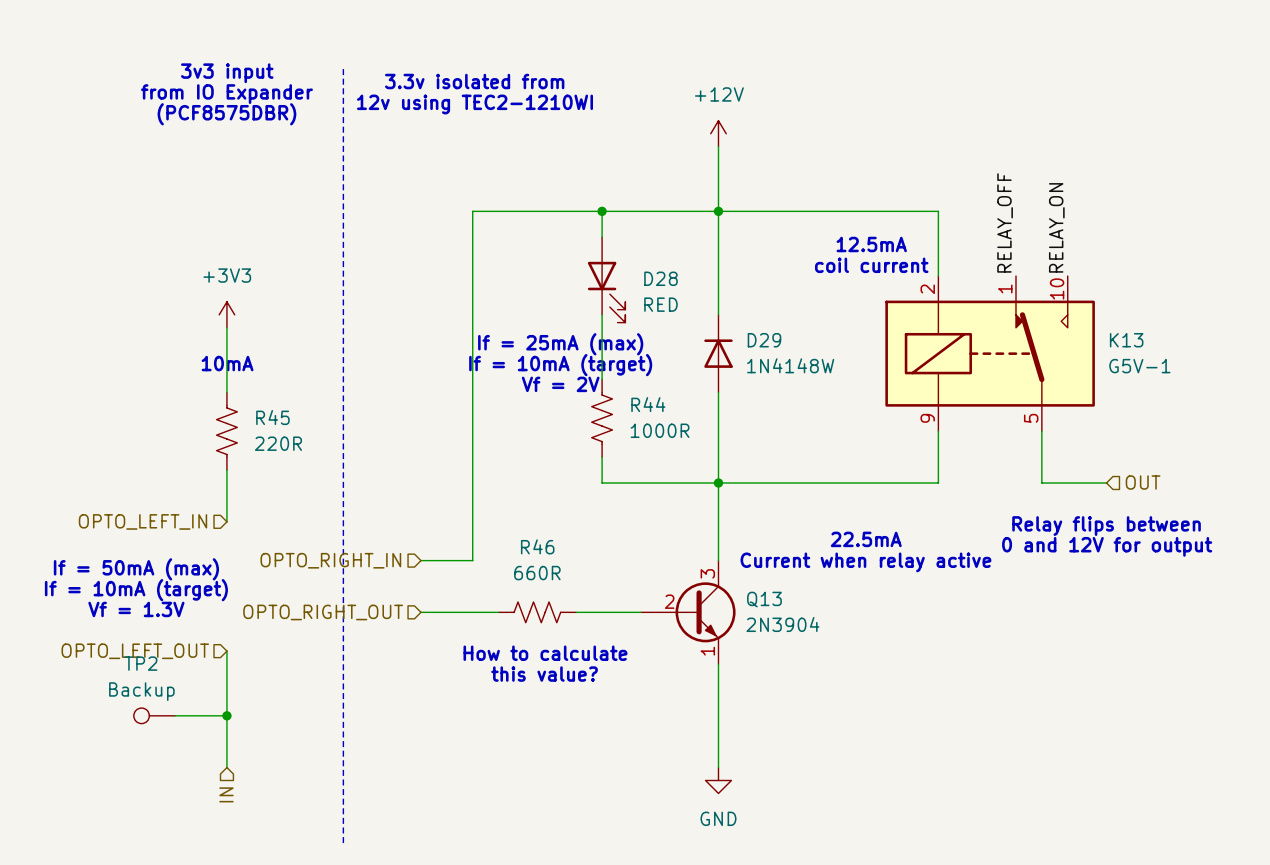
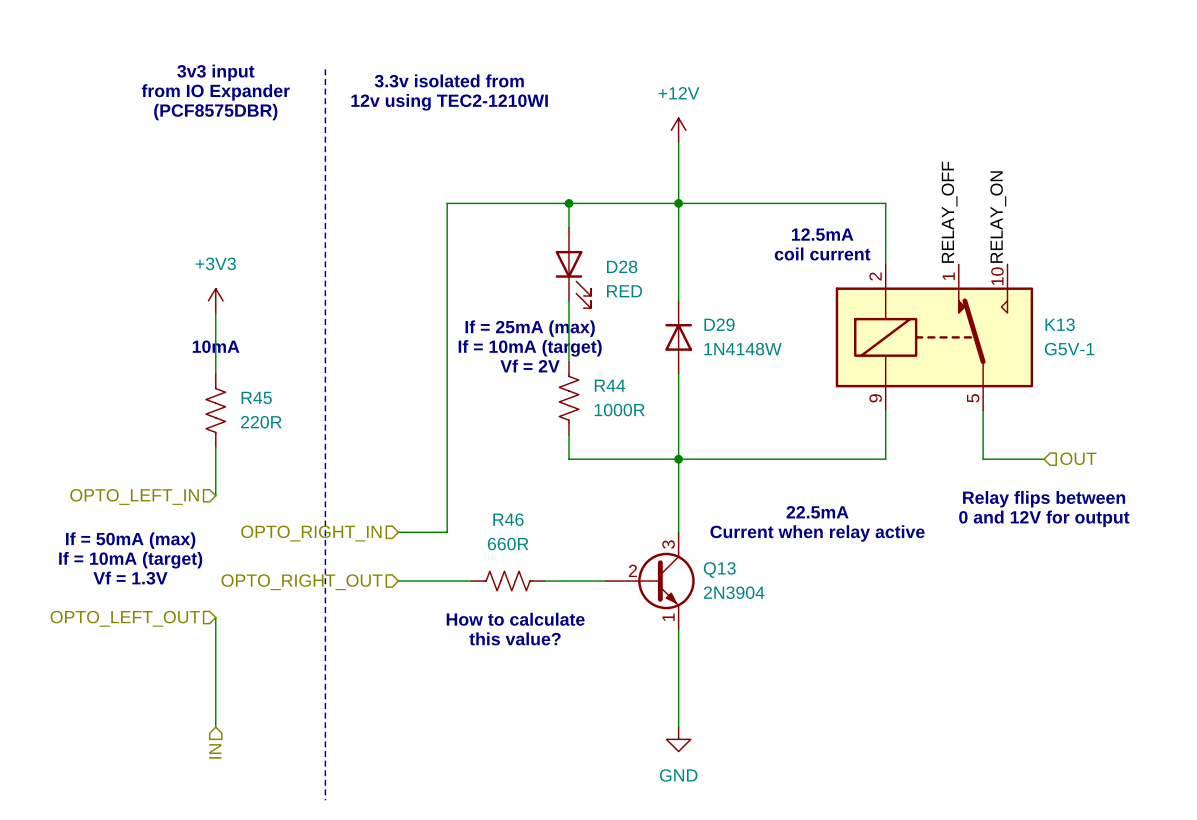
TP2: Backup (154, 715) -> none
wire: (175, 715) (226, 715) -> none
junction: (226, 715) -> none

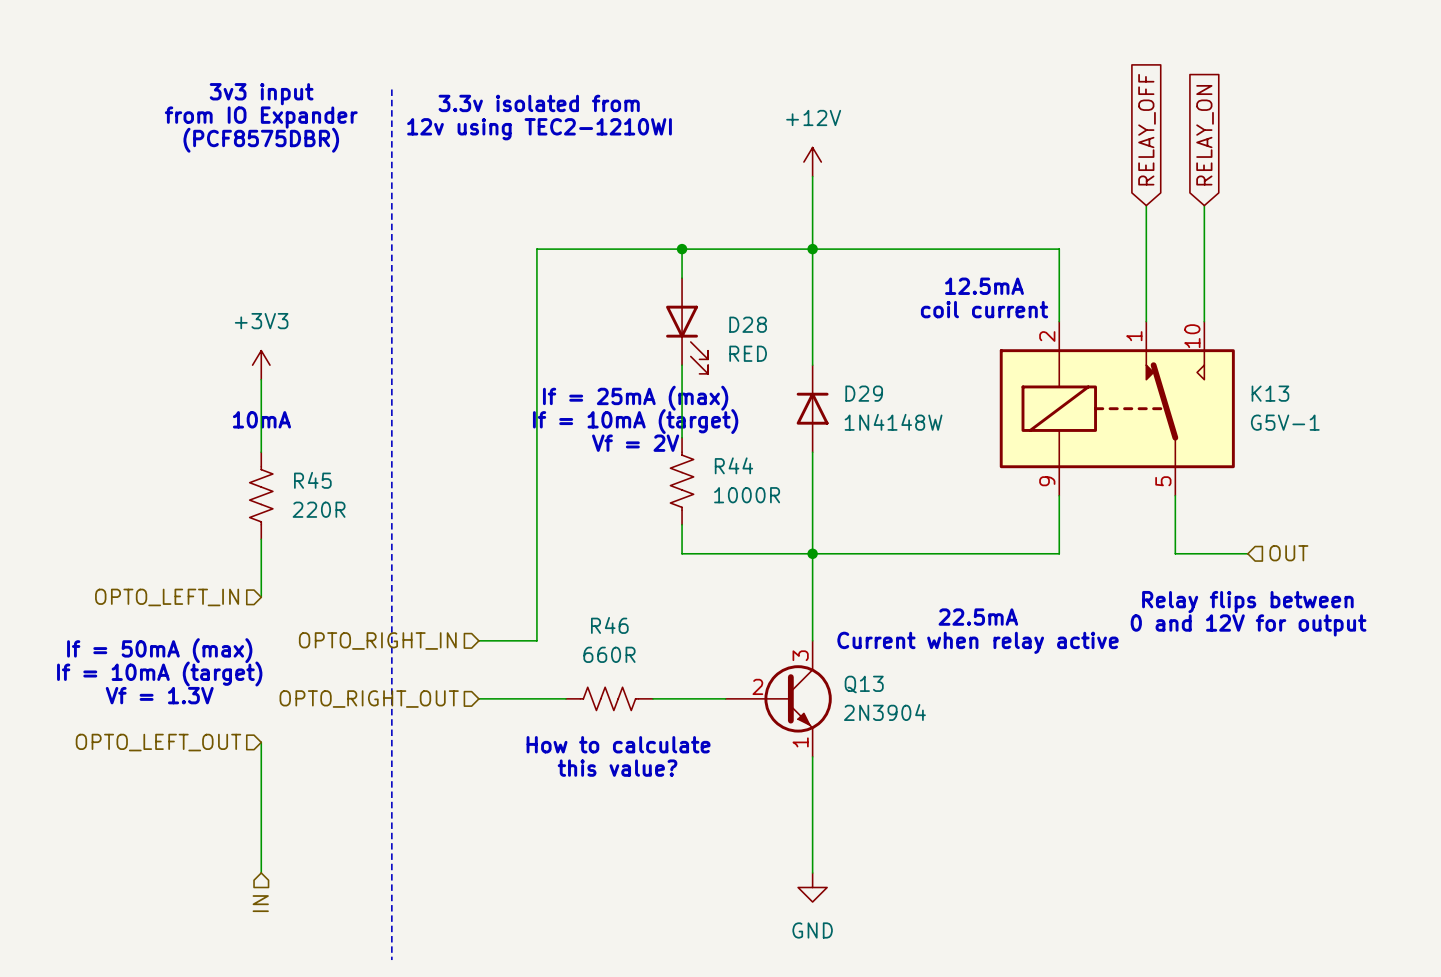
global label: none -> RELAY_OFF (1147, 129)
global label: none -> RELAY_ON (1205, 135)
wire: none -> (1146, 205) (1146, 321)
wire: none -> (1204, 205) (1204, 321)
label: RELAY_OFF (949, 212) -> none
label: RELAY_ON (998, 217) -> none

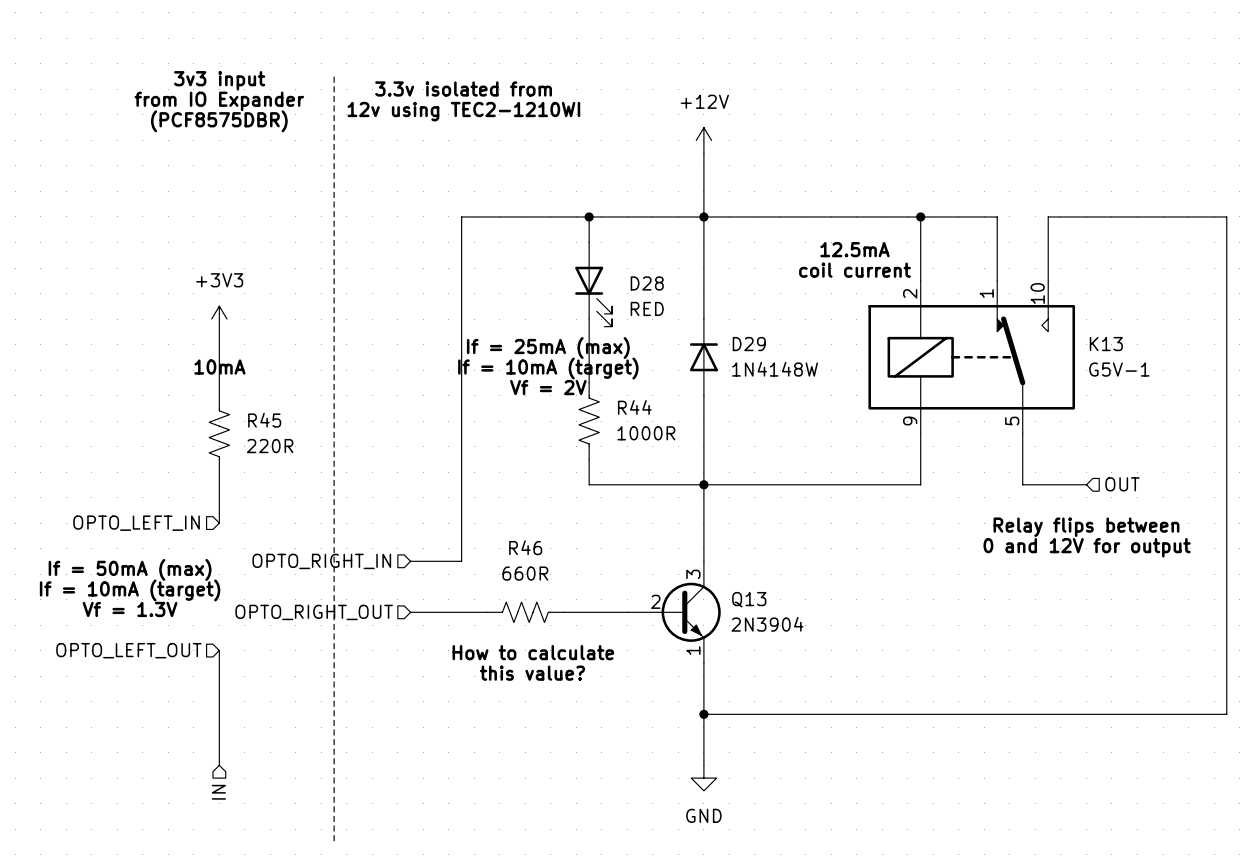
global label: RELAY_OFF (1147, 129) -> none
global label: RELAY_ON (1205, 135) -> none
wire: (1146, 205) (1146, 249) -> (920, 216) (997, 216)
wire: (1204, 205) (1204, 249) -> (703, 714) (1226, 714) (1226, 216) (1048, 216)
junction: none -> (920, 216)
text: 22.5mA (978, 617) -> none
text: Current when relay active (978, 642) -> none
junction: none -> (703, 714)

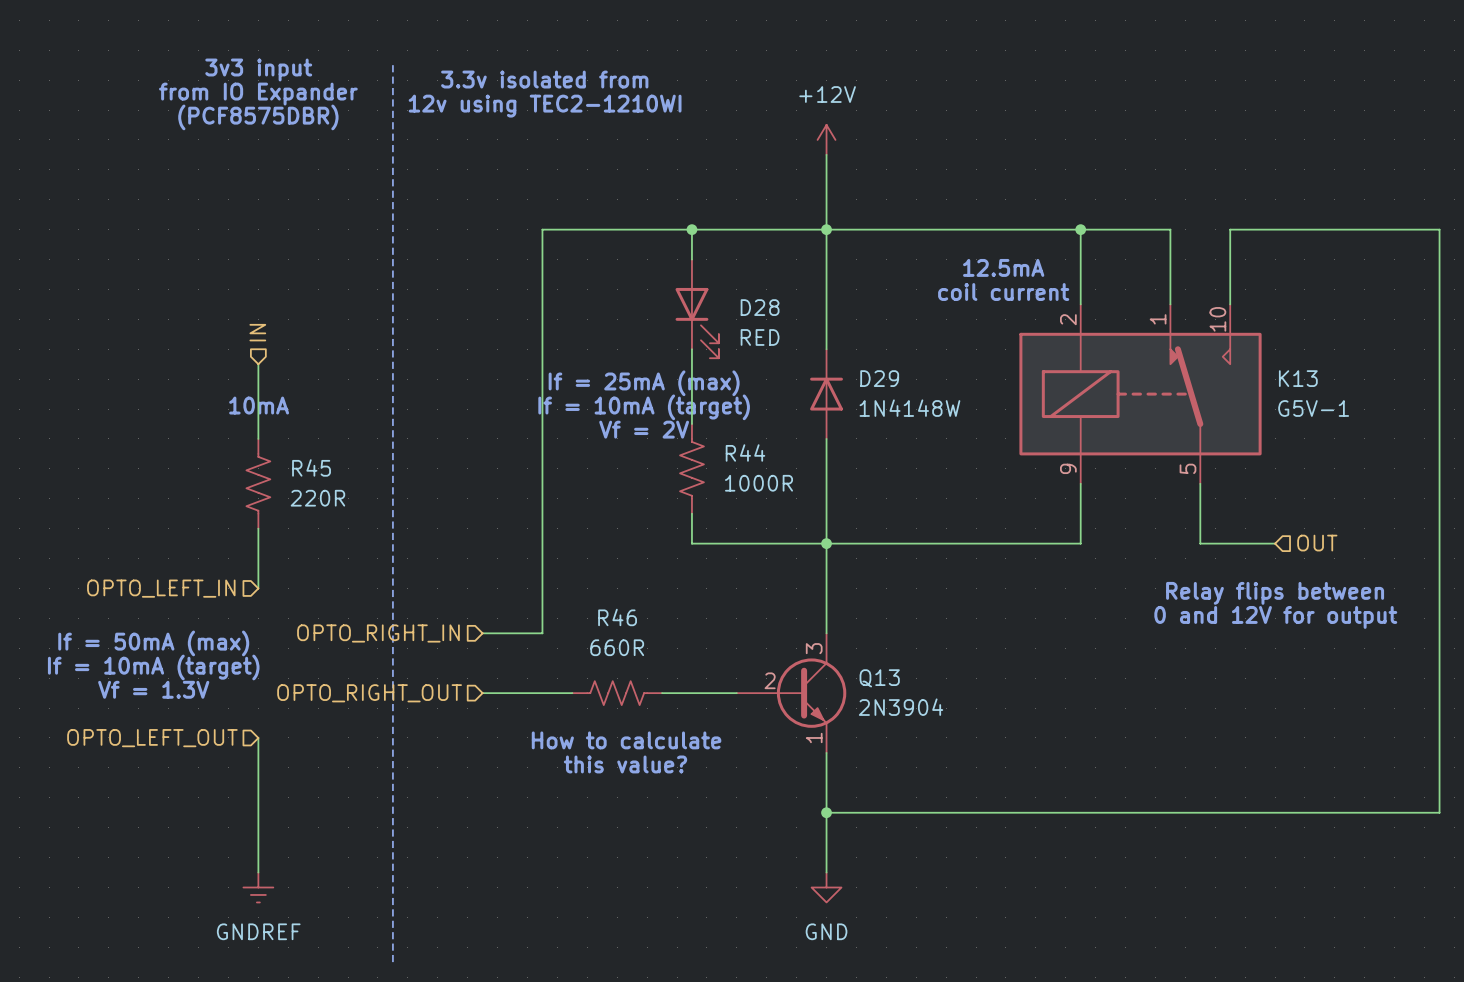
hierarchical label: none -> IN (257, 332)
power symbol: +3V3 (219, 319) -> none
power symbol: none -> GNDREF (258, 887)
hierarchical label: IN (218, 792) -> none

